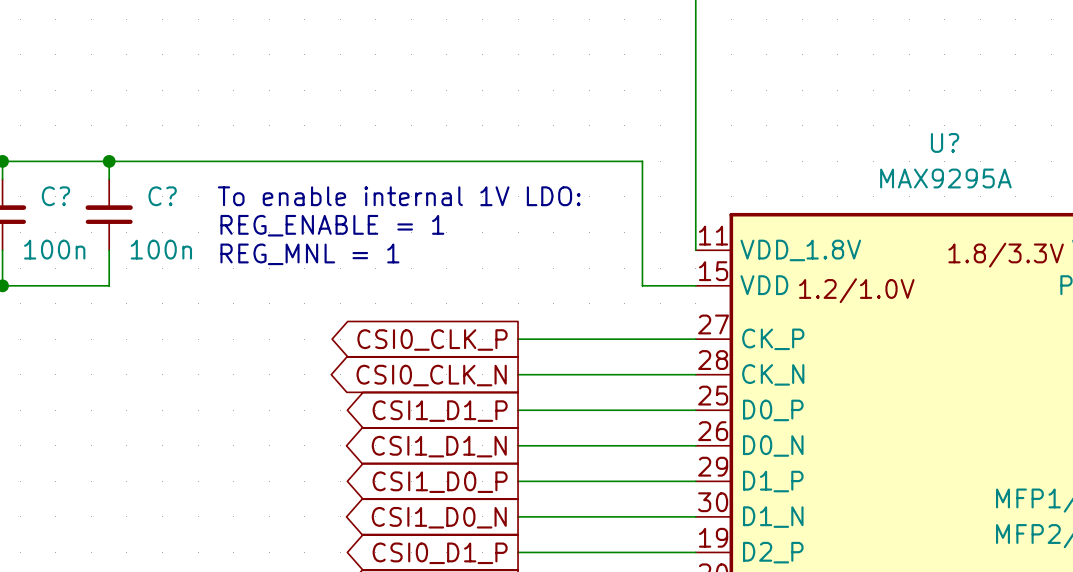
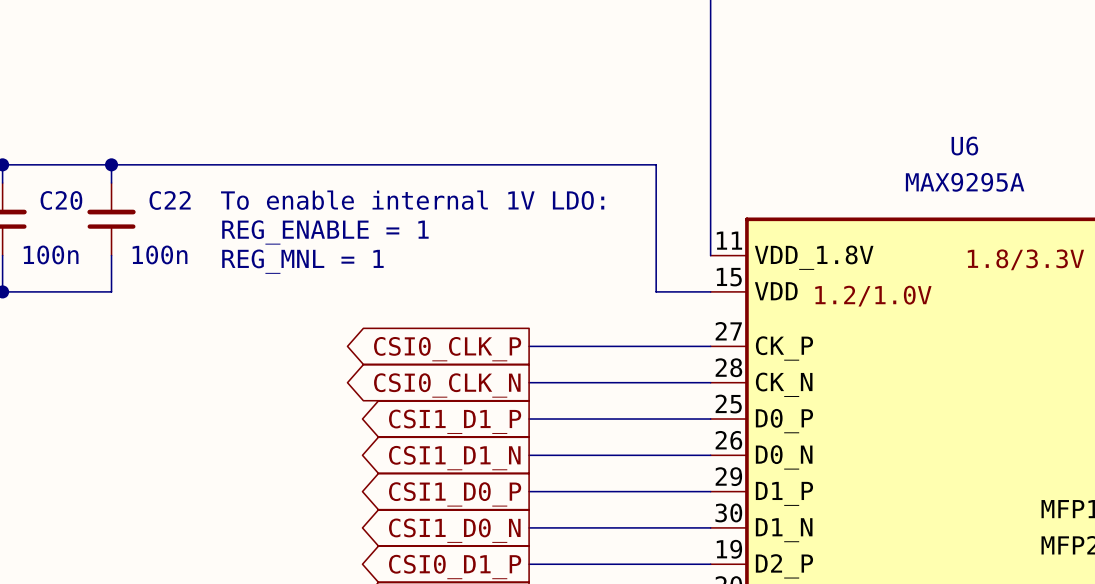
U? name: U? (945, 142) -> U6 (964, 146)
C? name: C? (55, 196) -> C20 (61, 200)
C? name: C? (162, 196) -> C22 (170, 200)

